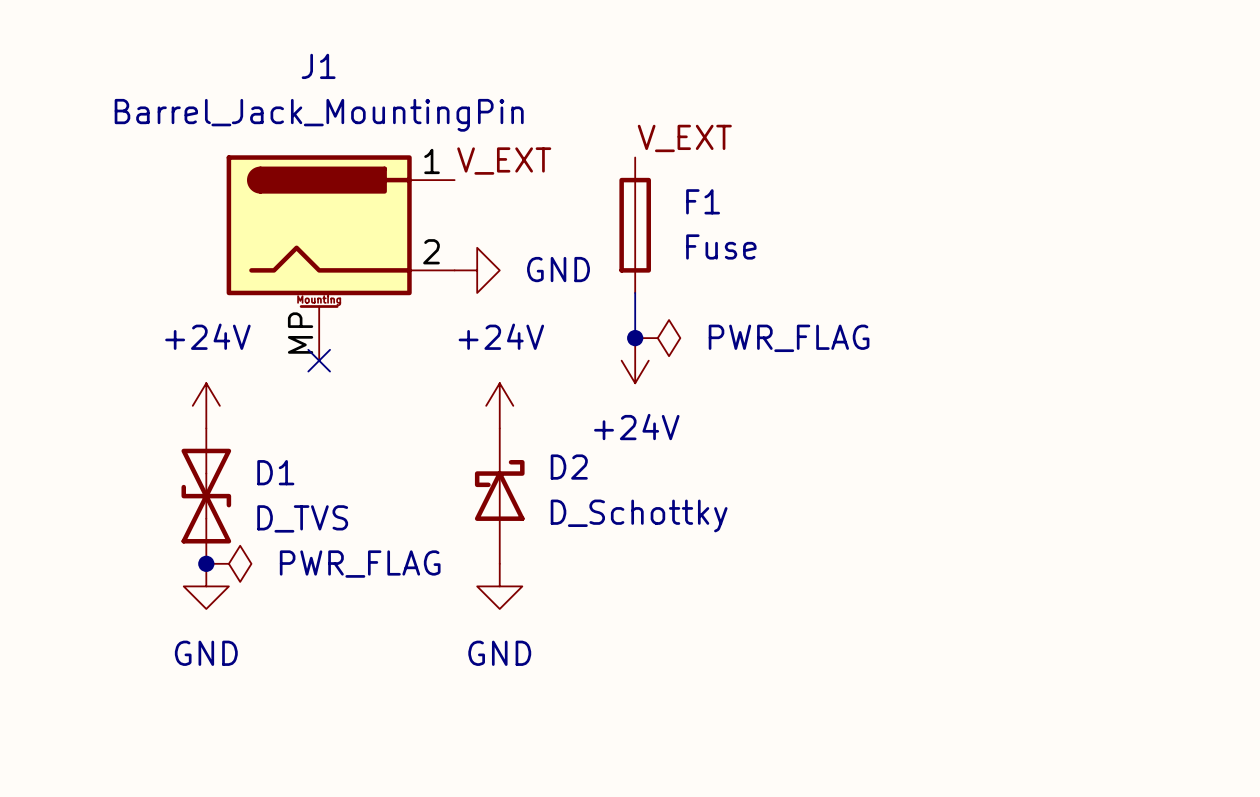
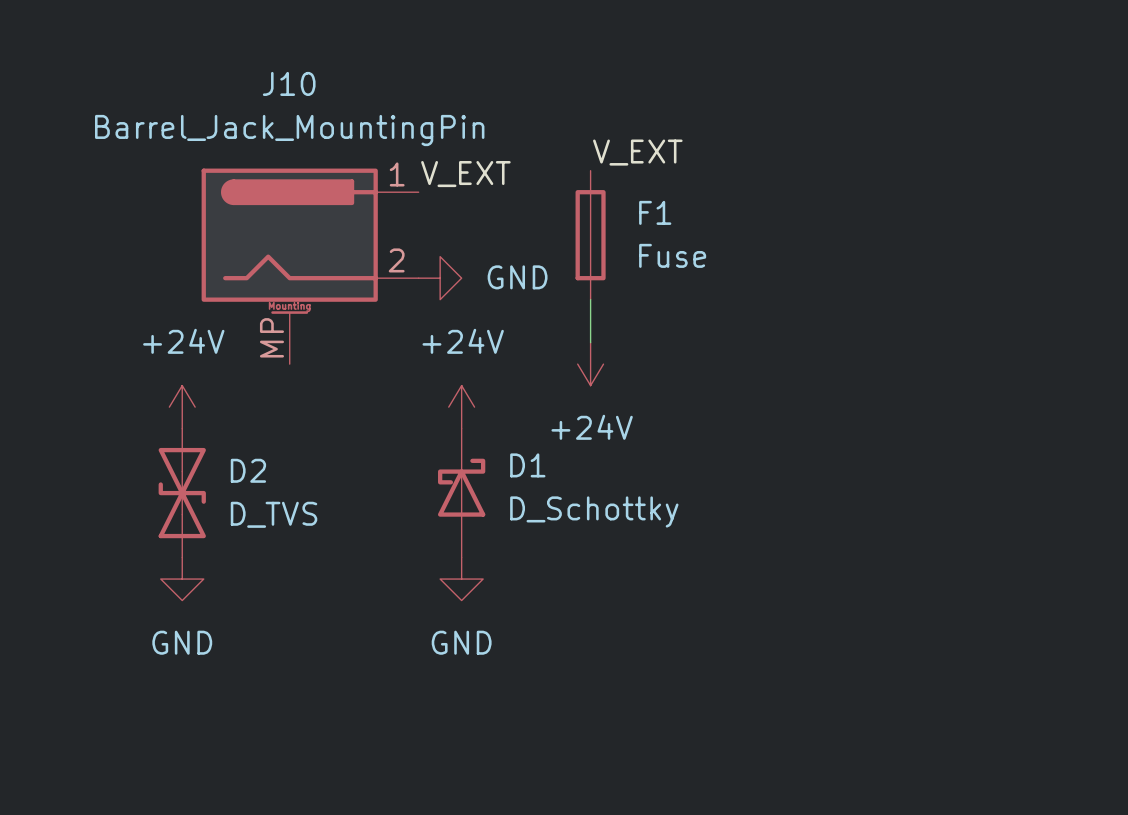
J1 name: J1 (318, 66) -> J10 (289, 83)
junction: (635, 338) -> none
power symbol: PWR_FLAG (657, 338) -> none
no-connect mark: (319, 360) -> none
D2 name: D2 (569, 467) -> D1 (527, 465)
D1 name: D1 (275, 472) -> D2 (248, 470)
junction: (206, 563) -> none
power symbol: PWR_FLAG (228, 563) -> none

